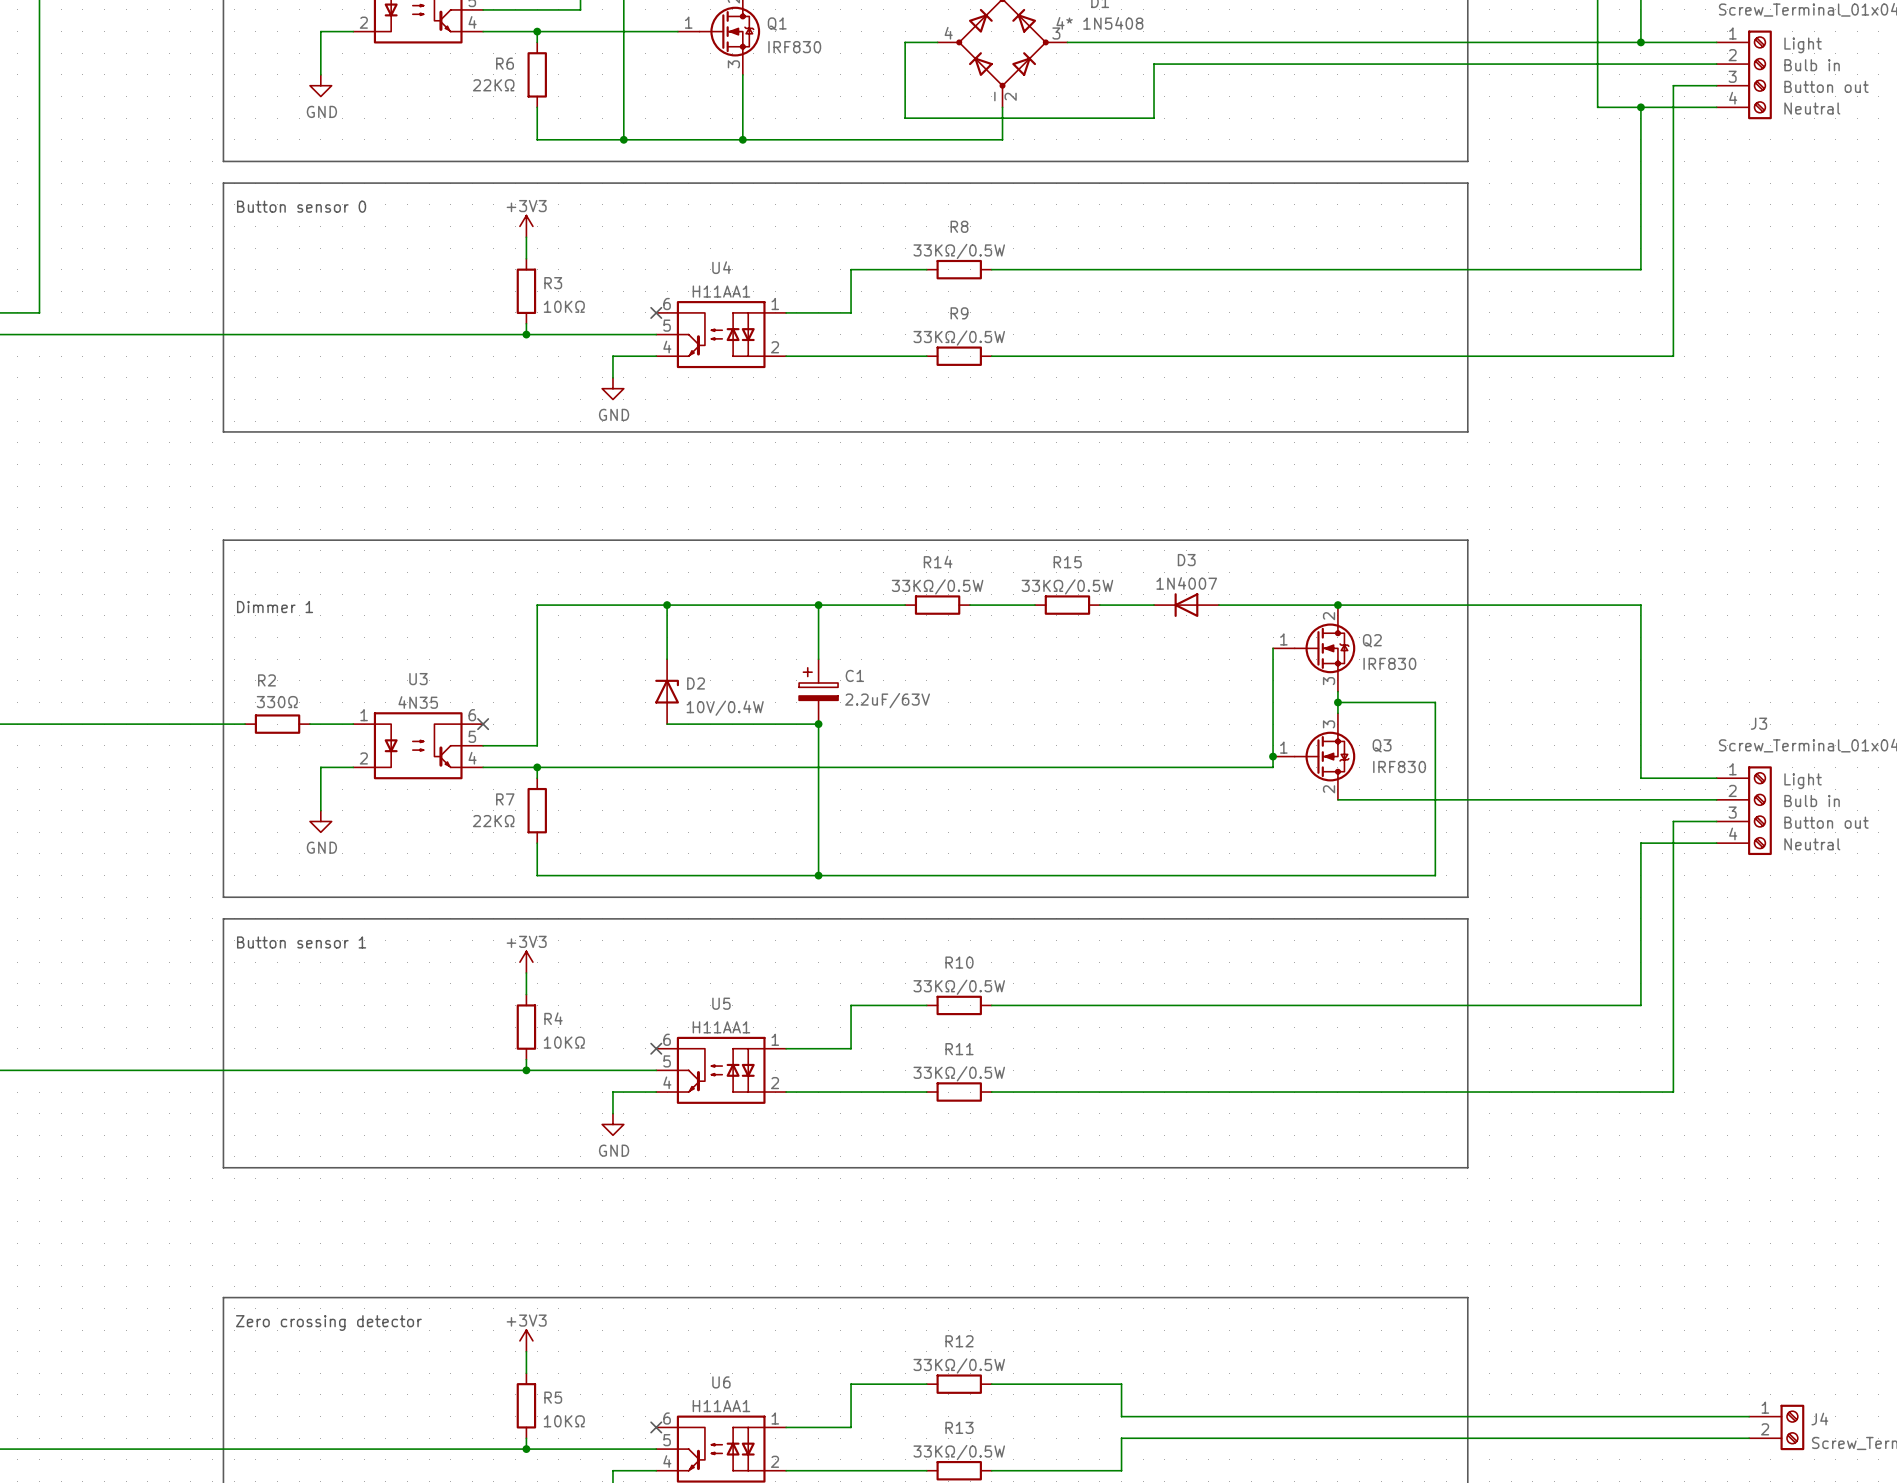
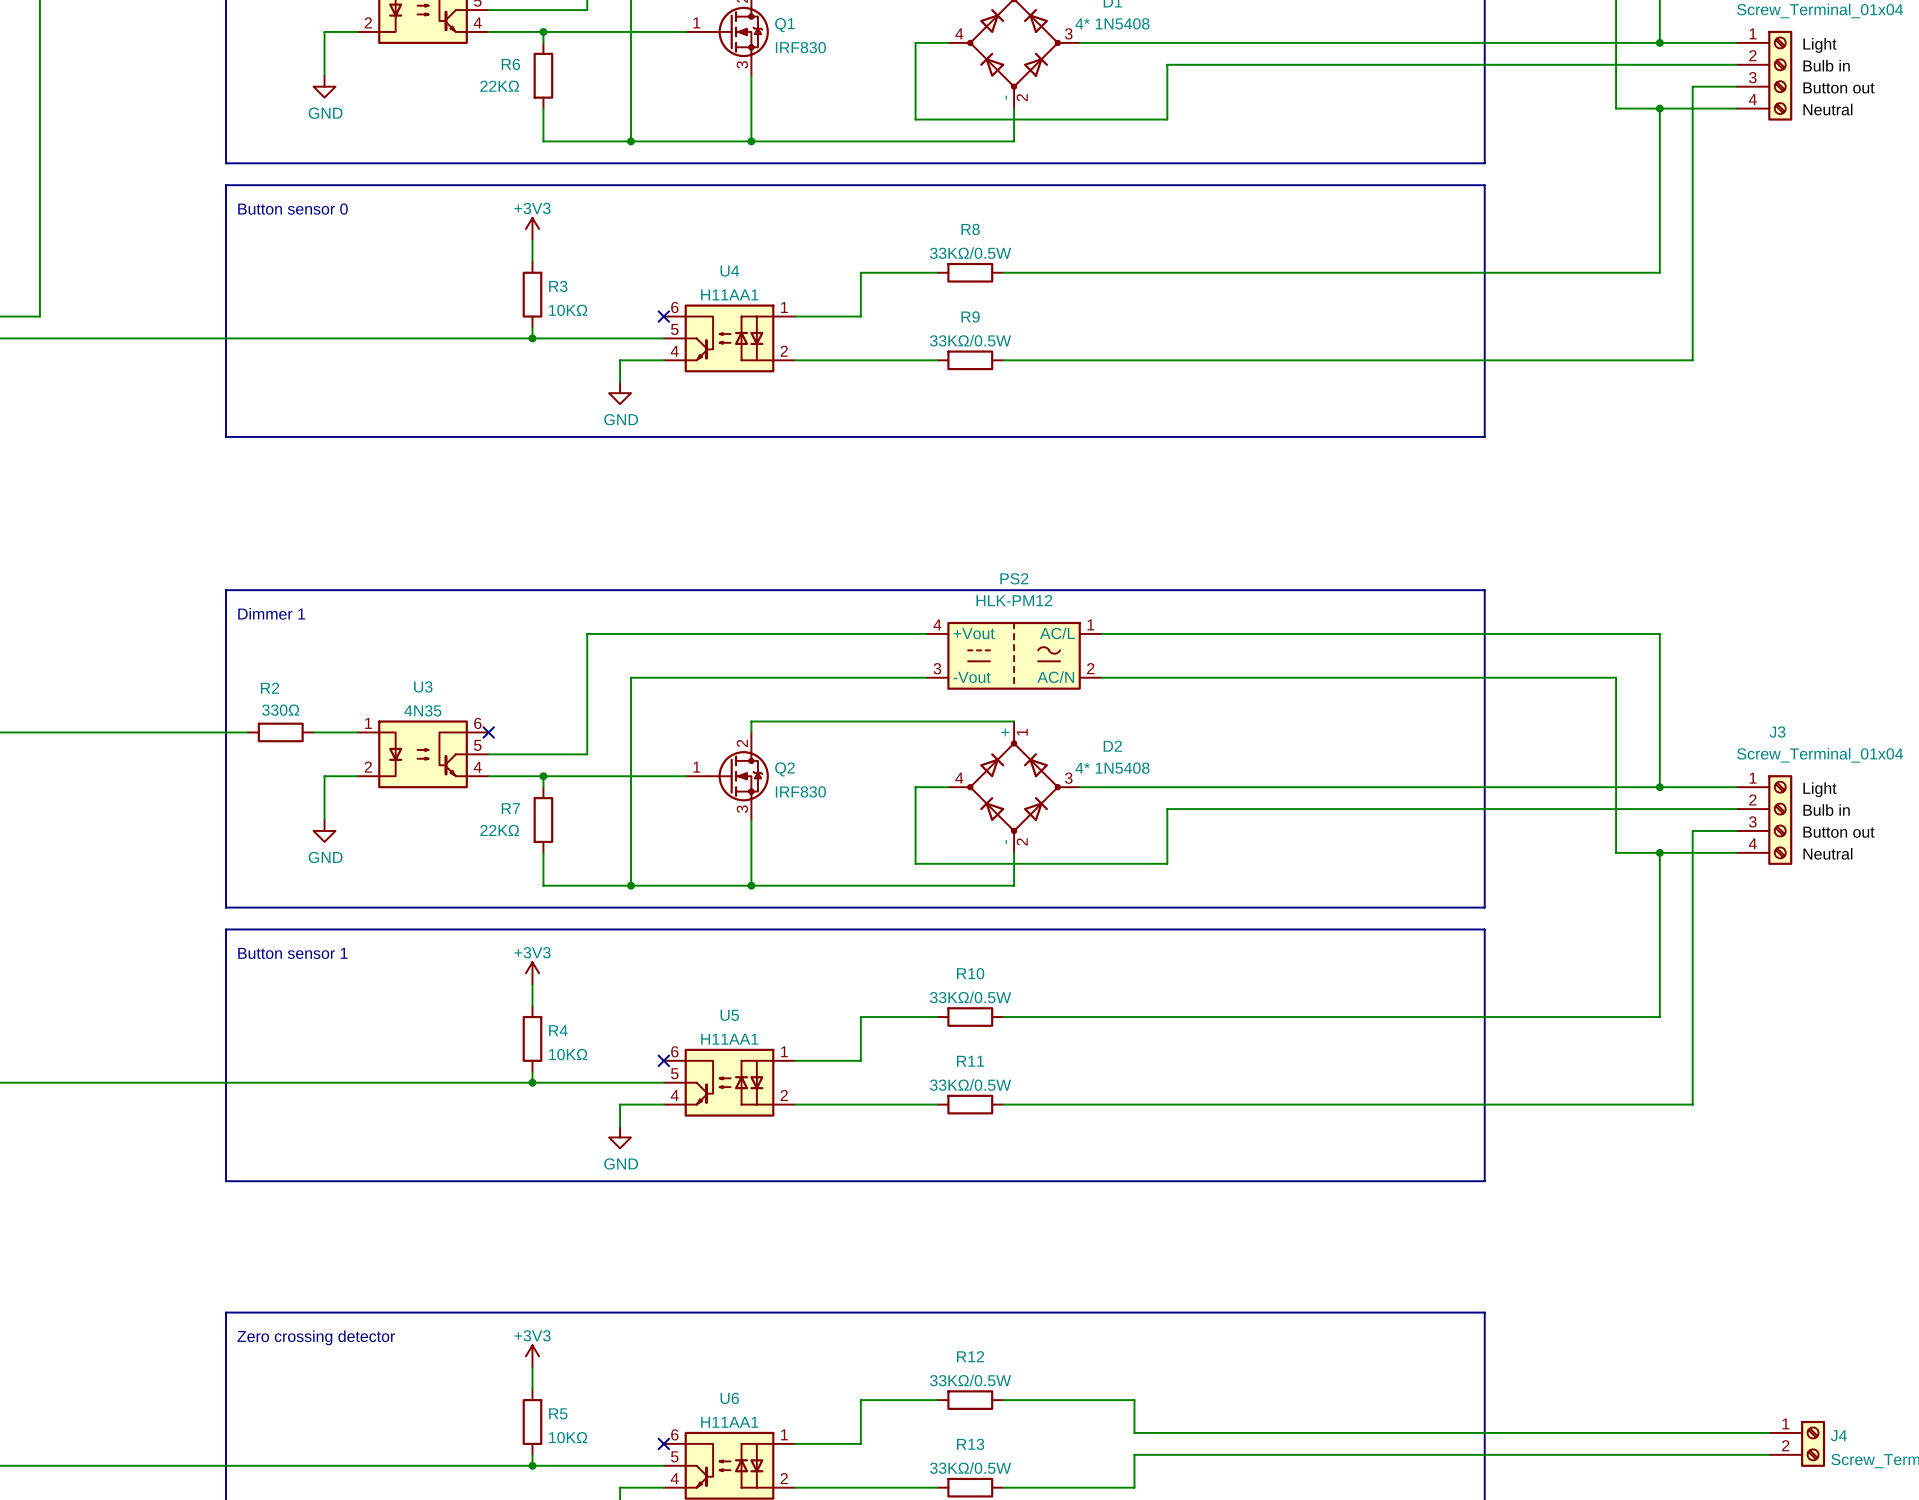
line: (223, 583) (223, 540) (1467, 540) (1467, 583) -> (226, 590) (1484, 590)
wire: (667, 605) (667, 659) -> none
junction: (667, 605) -> none
wire: (818, 605) (818, 659) -> none
junction: (818, 605) -> none
wire: (905, 605) (537, 605) (537, 745) -> (926, 633) (587, 633) (587, 754) (543, 754)
R14: 33KΩ/0.5W (937, 605) -> none
wire: (970, 605) (1034, 605) -> none
R15: 33KΩ/0.5W (1067, 605) -> none
wire: (1099, 605) (1154, 605) -> none
D3: 1N4007 (1186, 605) -> none
wire: (1218, 605) (1640, 605) (1640, 626) -> (1101, 633) (1659, 633)
junction: (1337, 605) -> none
PS2: none -> HLK-PM12 (1014, 655)
wire: (1273, 648) (1273, 767) (677, 767) -> none
Q2 position: (1314, 648) -> (727, 776)
D2 symbol: [655, 659, 679, 725] -> [948, 721, 1080, 853]
wire: none -> (926, 677) (630, 677) (630, 885)
wire: none -> (1101, 677) (1616, 677) (1616, 852) (1659, 852)
D2 name position: D2 (696, 683) -> D2 (1112, 746)
C1: 2.2uF/63V (818, 691) -> none
wire: (1337, 691) (1337, 713) -> none
wire: (1337, 702) (1435, 702) (1435, 875) (1002, 875) -> (1014, 852) (1014, 885)
junction: (1337, 702) -> none
D2 value: 10V/0.4W (725, 708) -> 4* 1N5408 (1112, 768)
wire: none -> (1014, 721) (751, 721) (751, 732)
wire: (667, 724) (818, 724) (818, 875) -> none
junction: (818, 724) -> none
junction: (1273, 756) -> none
Q3: IRF830 (1314, 756) -> none
wire: none -> (948, 787) (915, 787) (915, 863) (1167, 863) (1167, 809) (1353, 809)
wire: none -> (1079, 787) (1659, 787)
junction: none -> (1659, 787)
wire: none -> (751, 820) (751, 885)
junction: none -> (1659, 852)
junction: none -> (630, 885)
junction: none -> (751, 885)
junction: (818, 875) -> none

